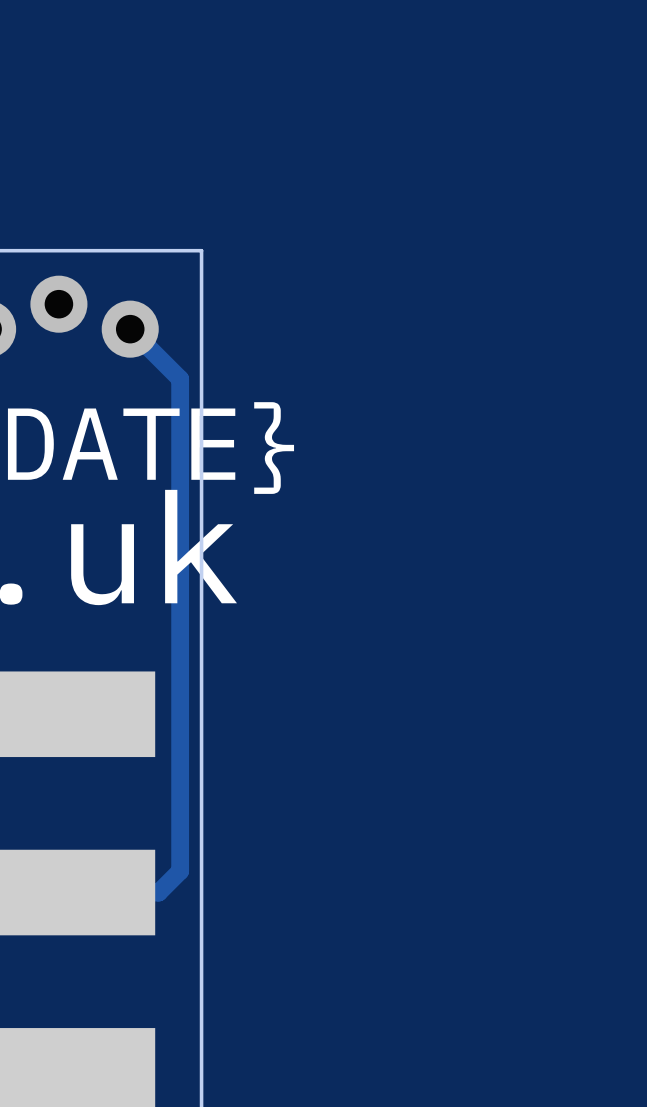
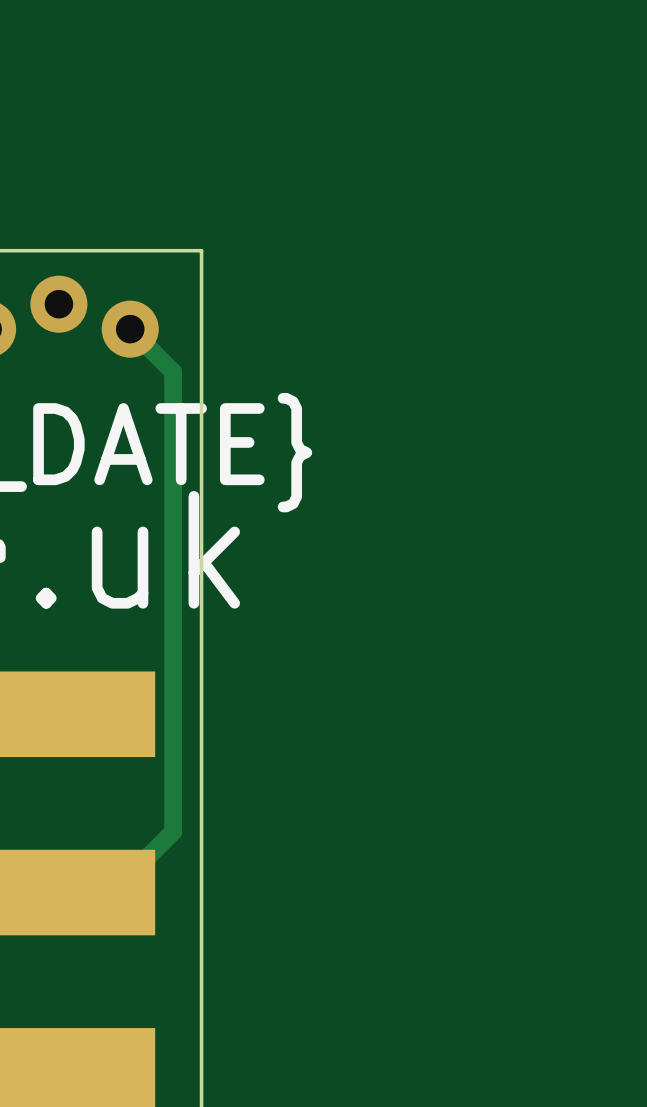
track: (173, 372) (180, 379) (180, 871) (158, 892) (112, 892) -> (173, 372) (173, 831) (112, 892)

